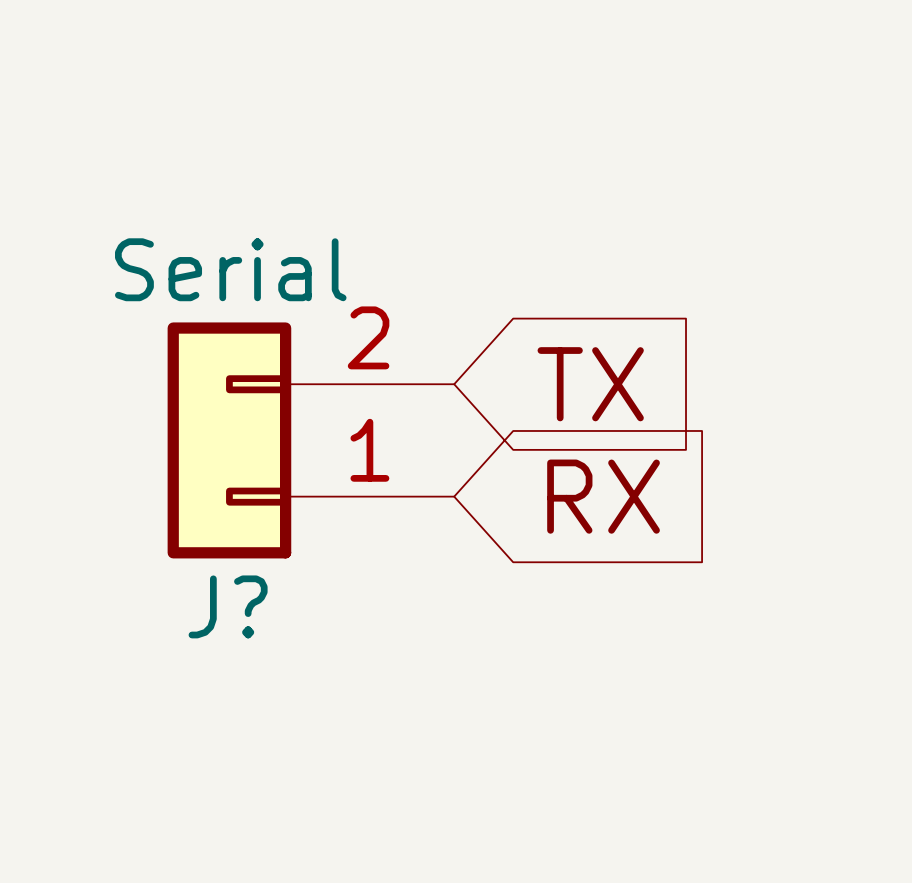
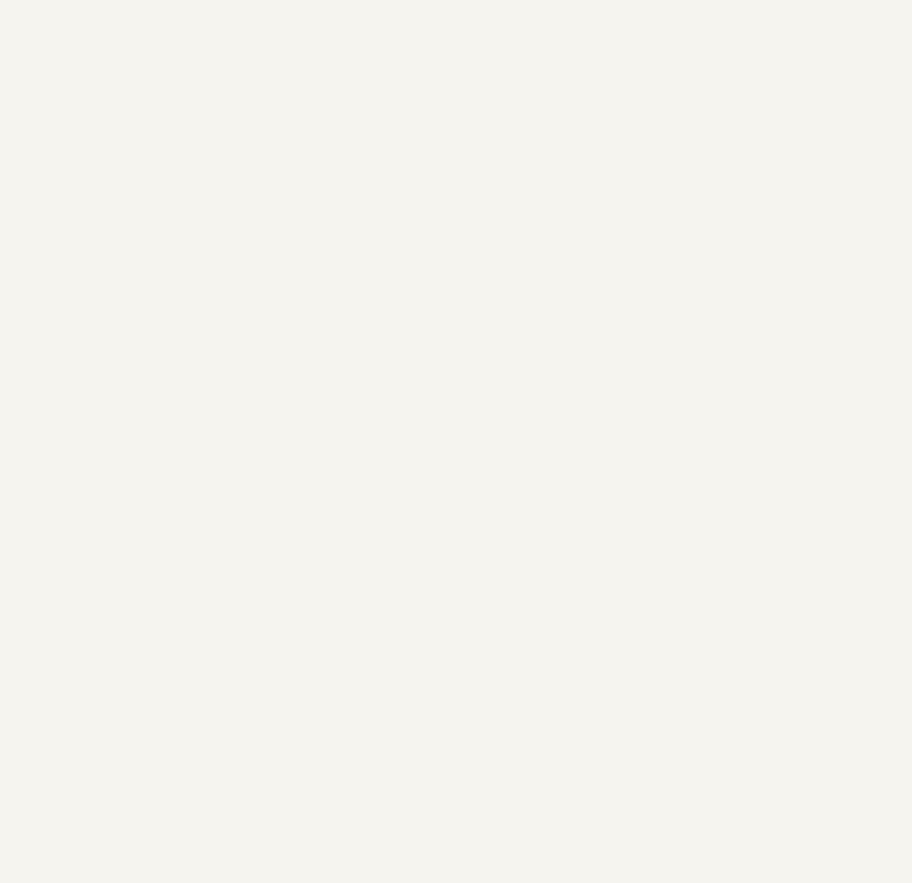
global label: TX (590, 384) -> none
J?: Serial (310, 440) -> none
global label: RX (603, 496) -> none

